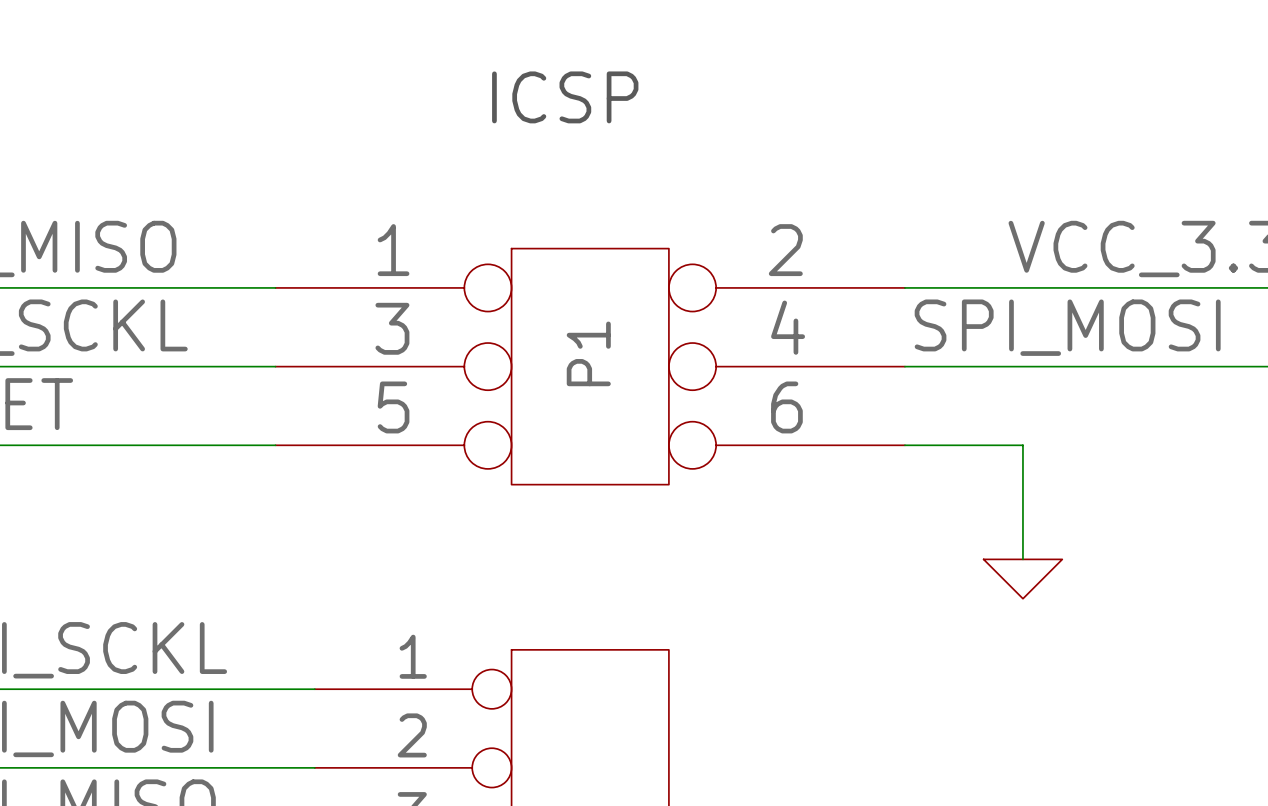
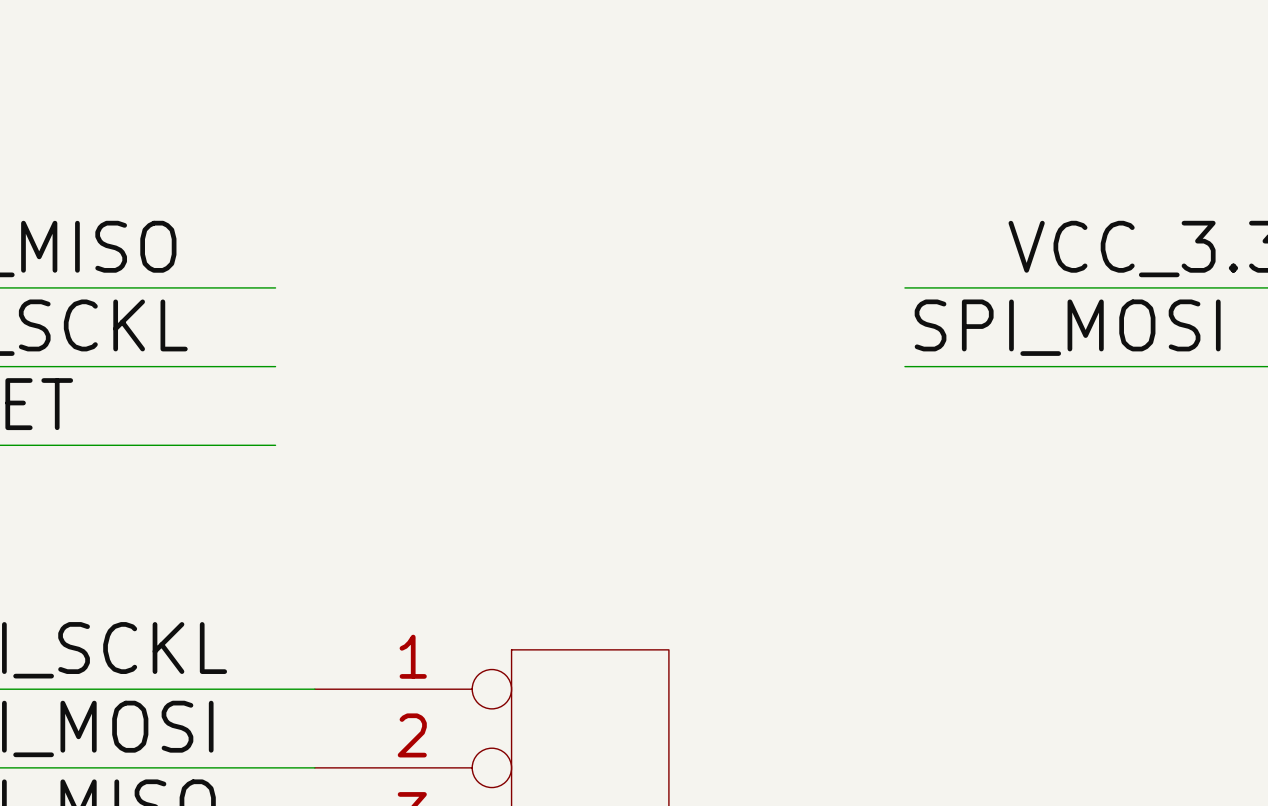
text: ICSP (565, 97) -> none
P1: (590, 366) -> none
wire: (904, 445) (1022, 445) (1022, 559) -> none
power symbol: (1022, 579) -> none

